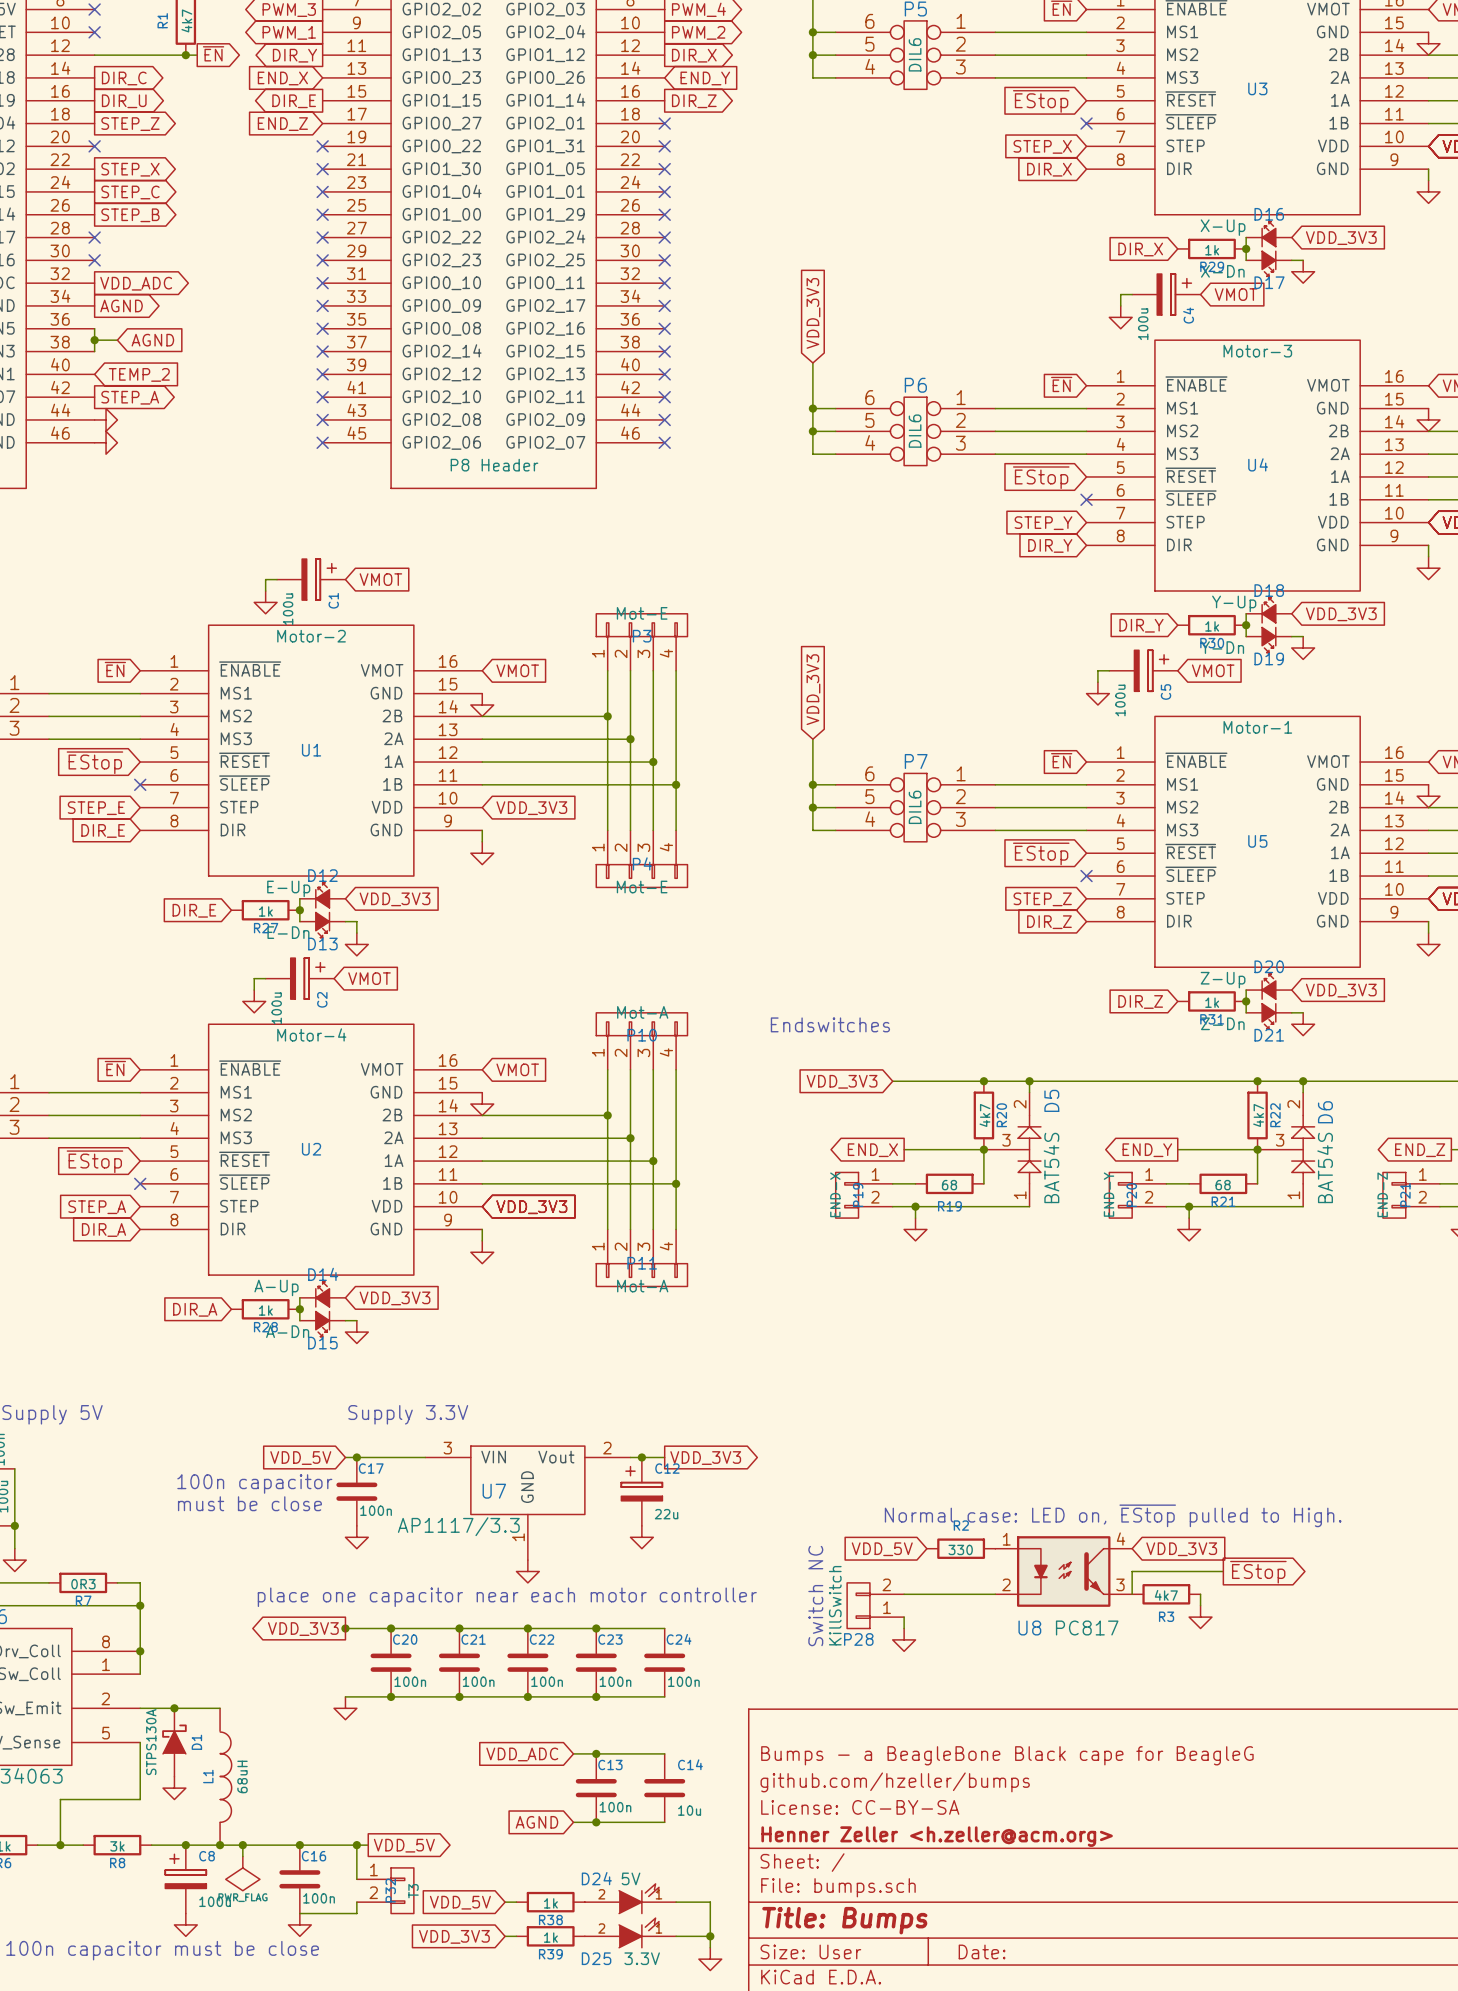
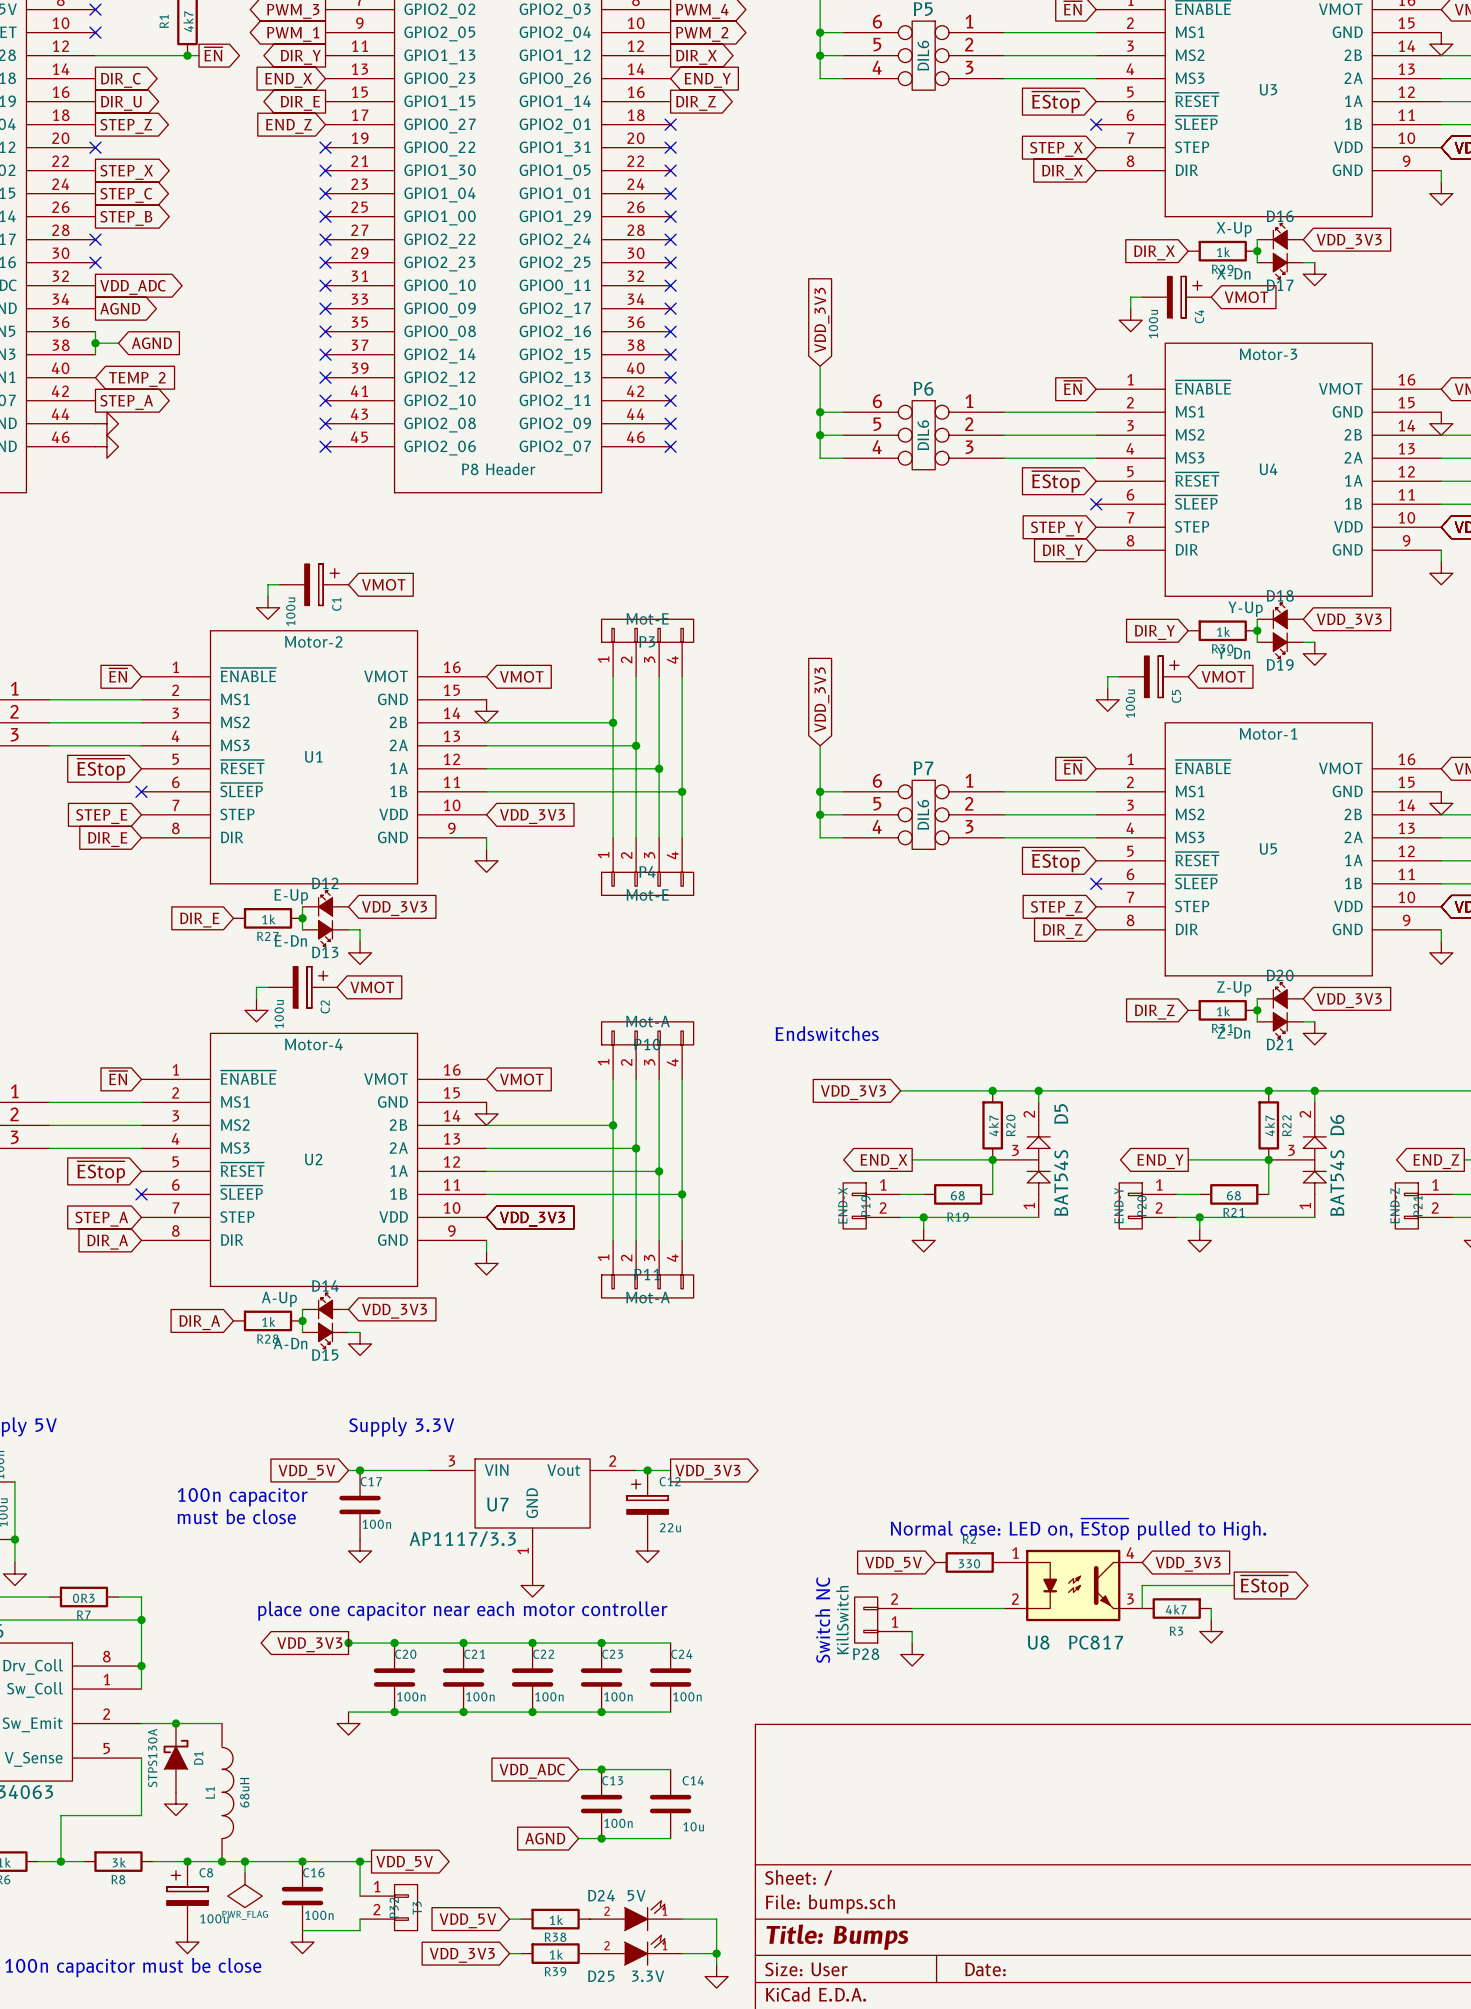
title block: Bumps - a BeagleBone Black cape for BeagleG (1007, 1755) -> none
title block: github.com/hzeller/bumps (895, 1782) -> none
title block: License: CC-BY-SA (860, 1807) -> none
title block: Henner Zeller <h.zeller@acm.org> (937, 1836) -> none

